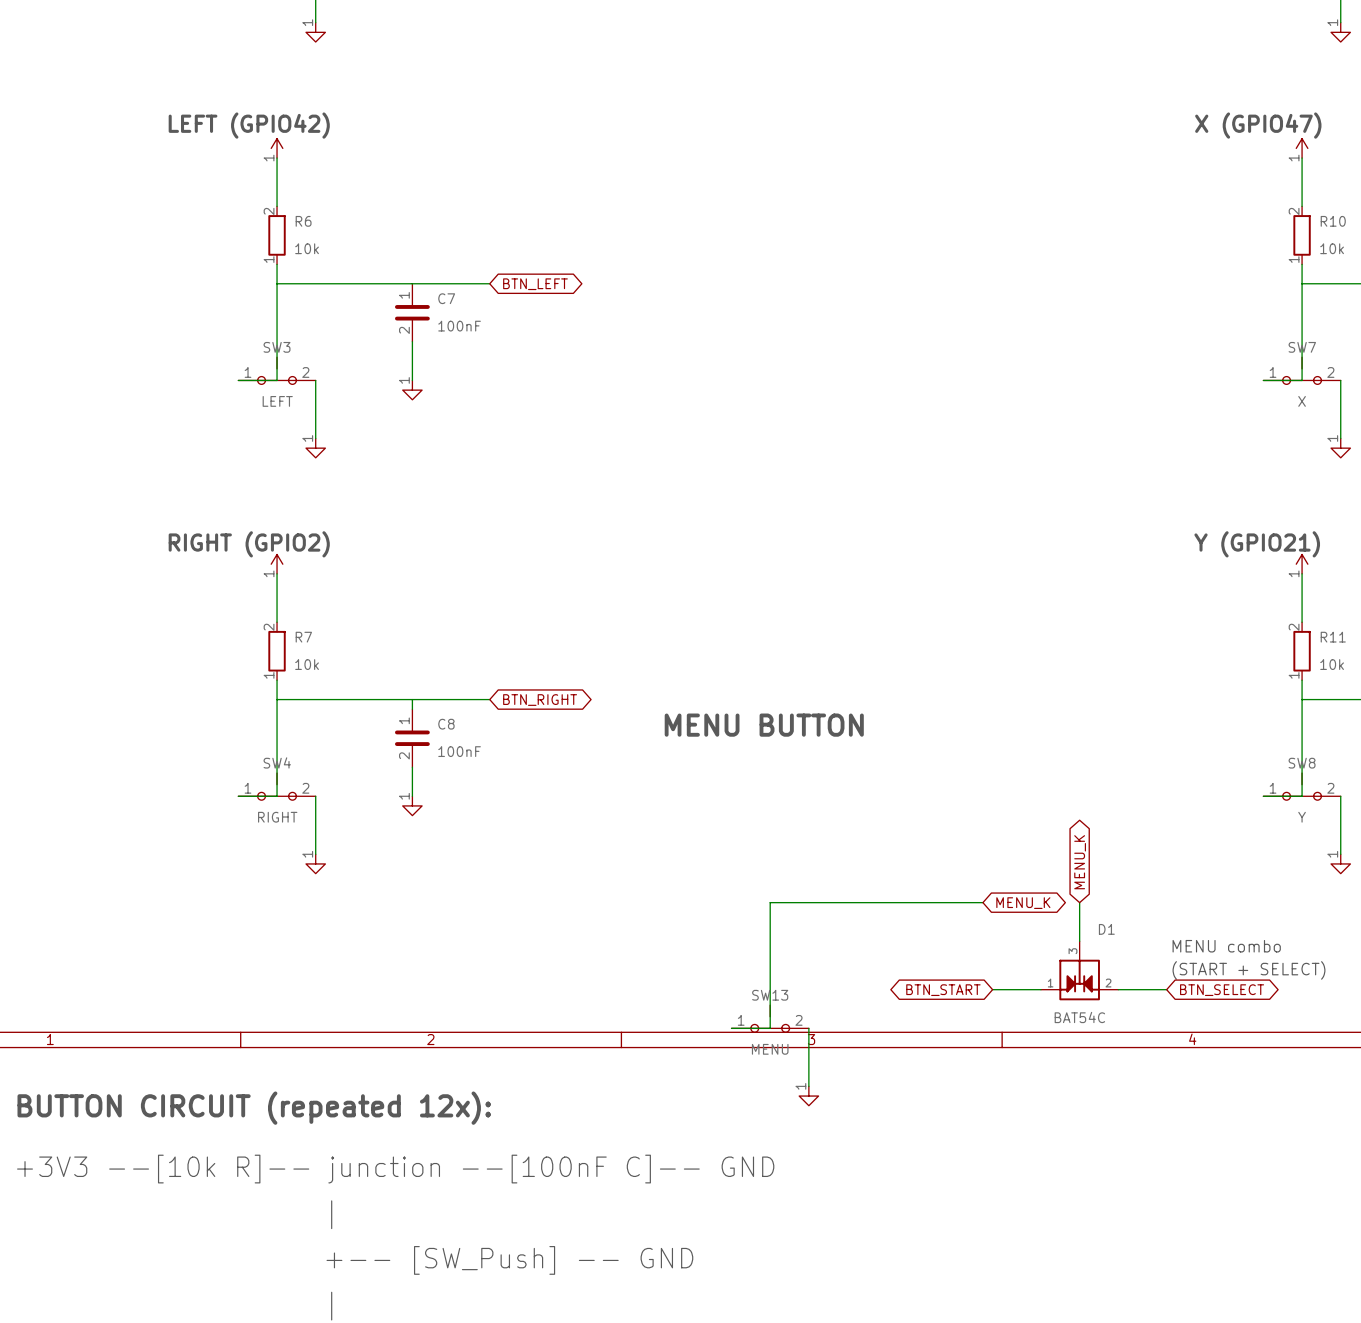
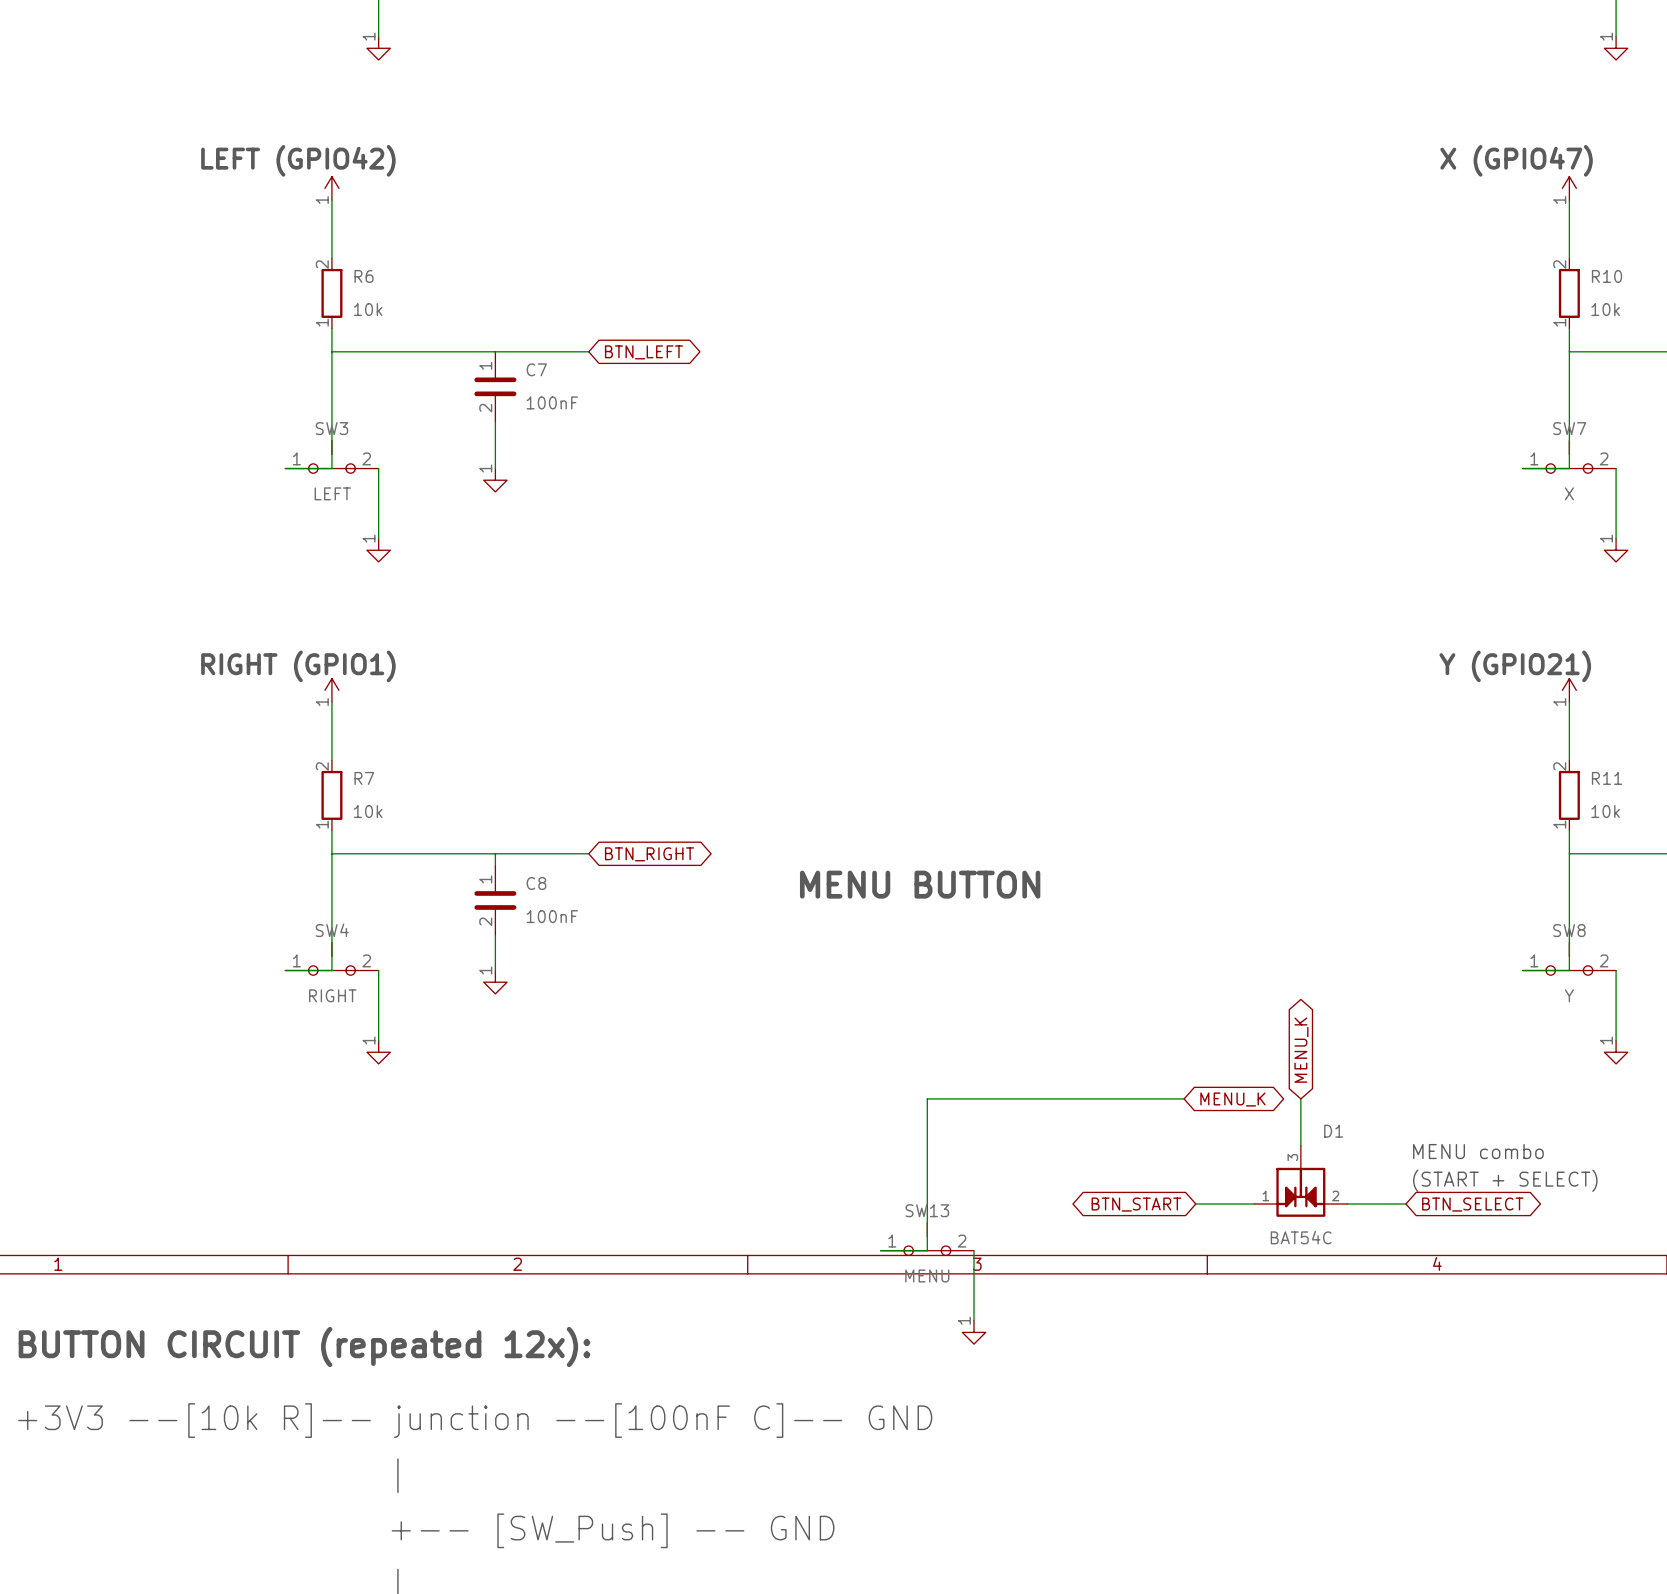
text: RIGHT (GPIO2) (249, 544) -> RIGHT (GPIO1) (298, 666)

